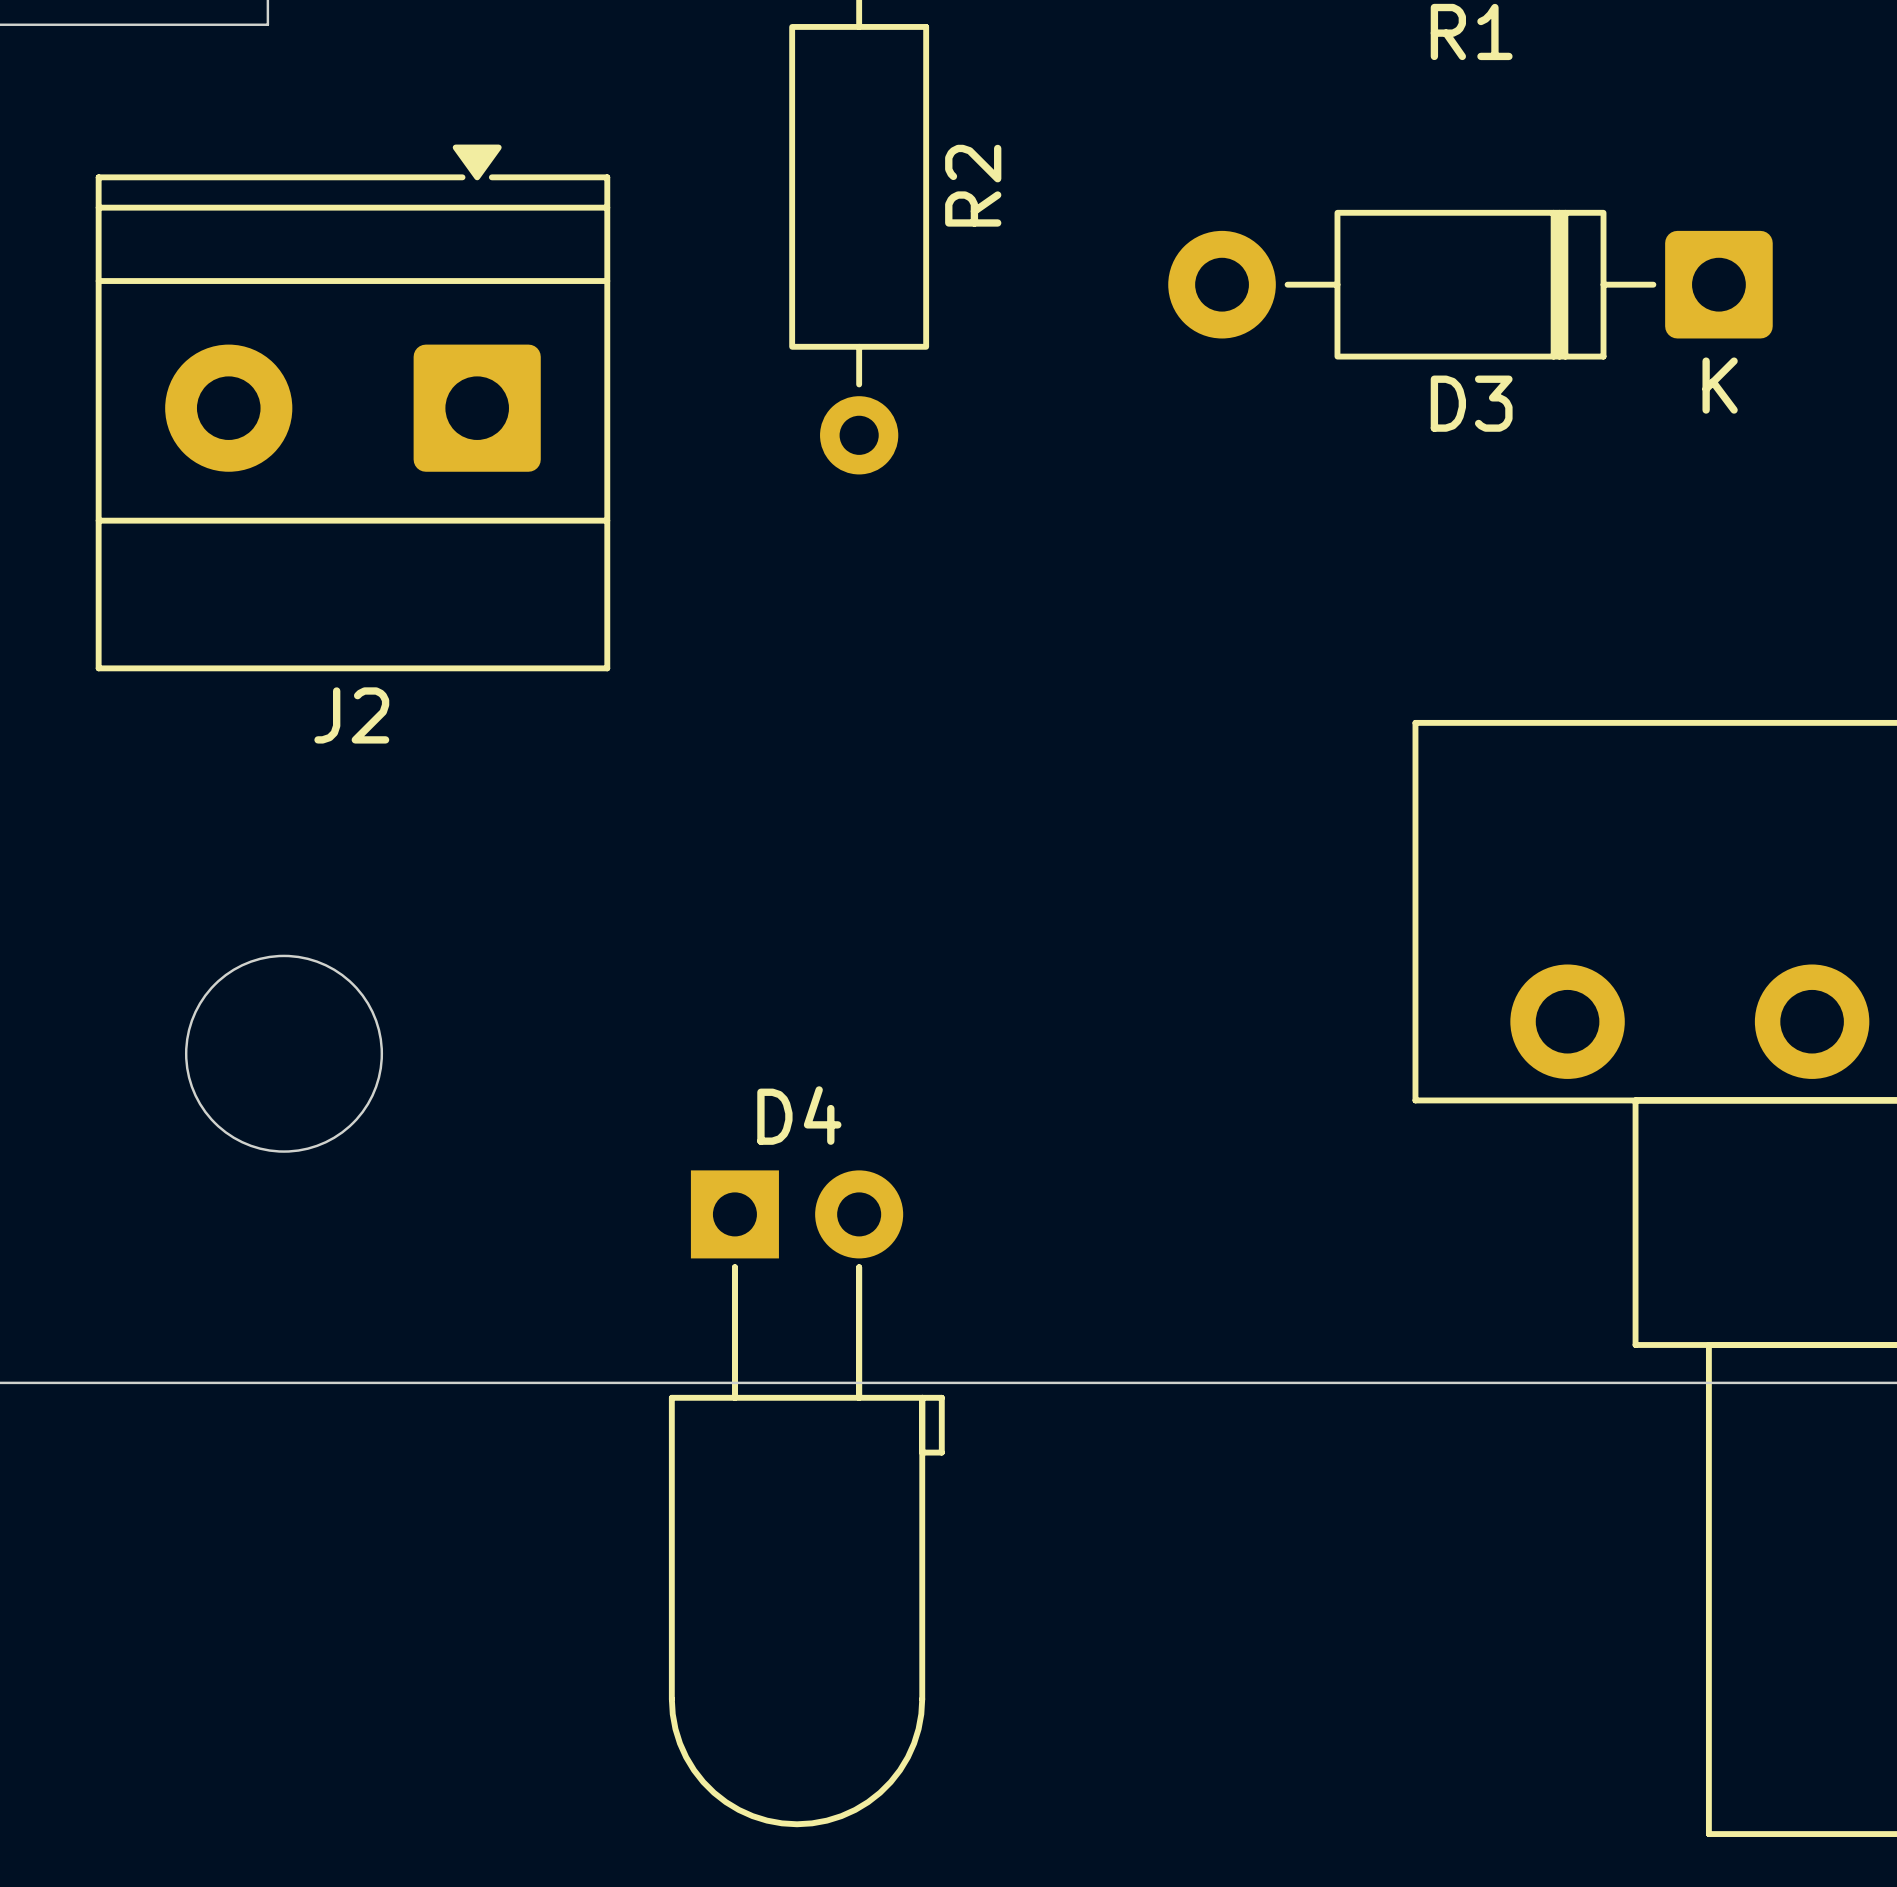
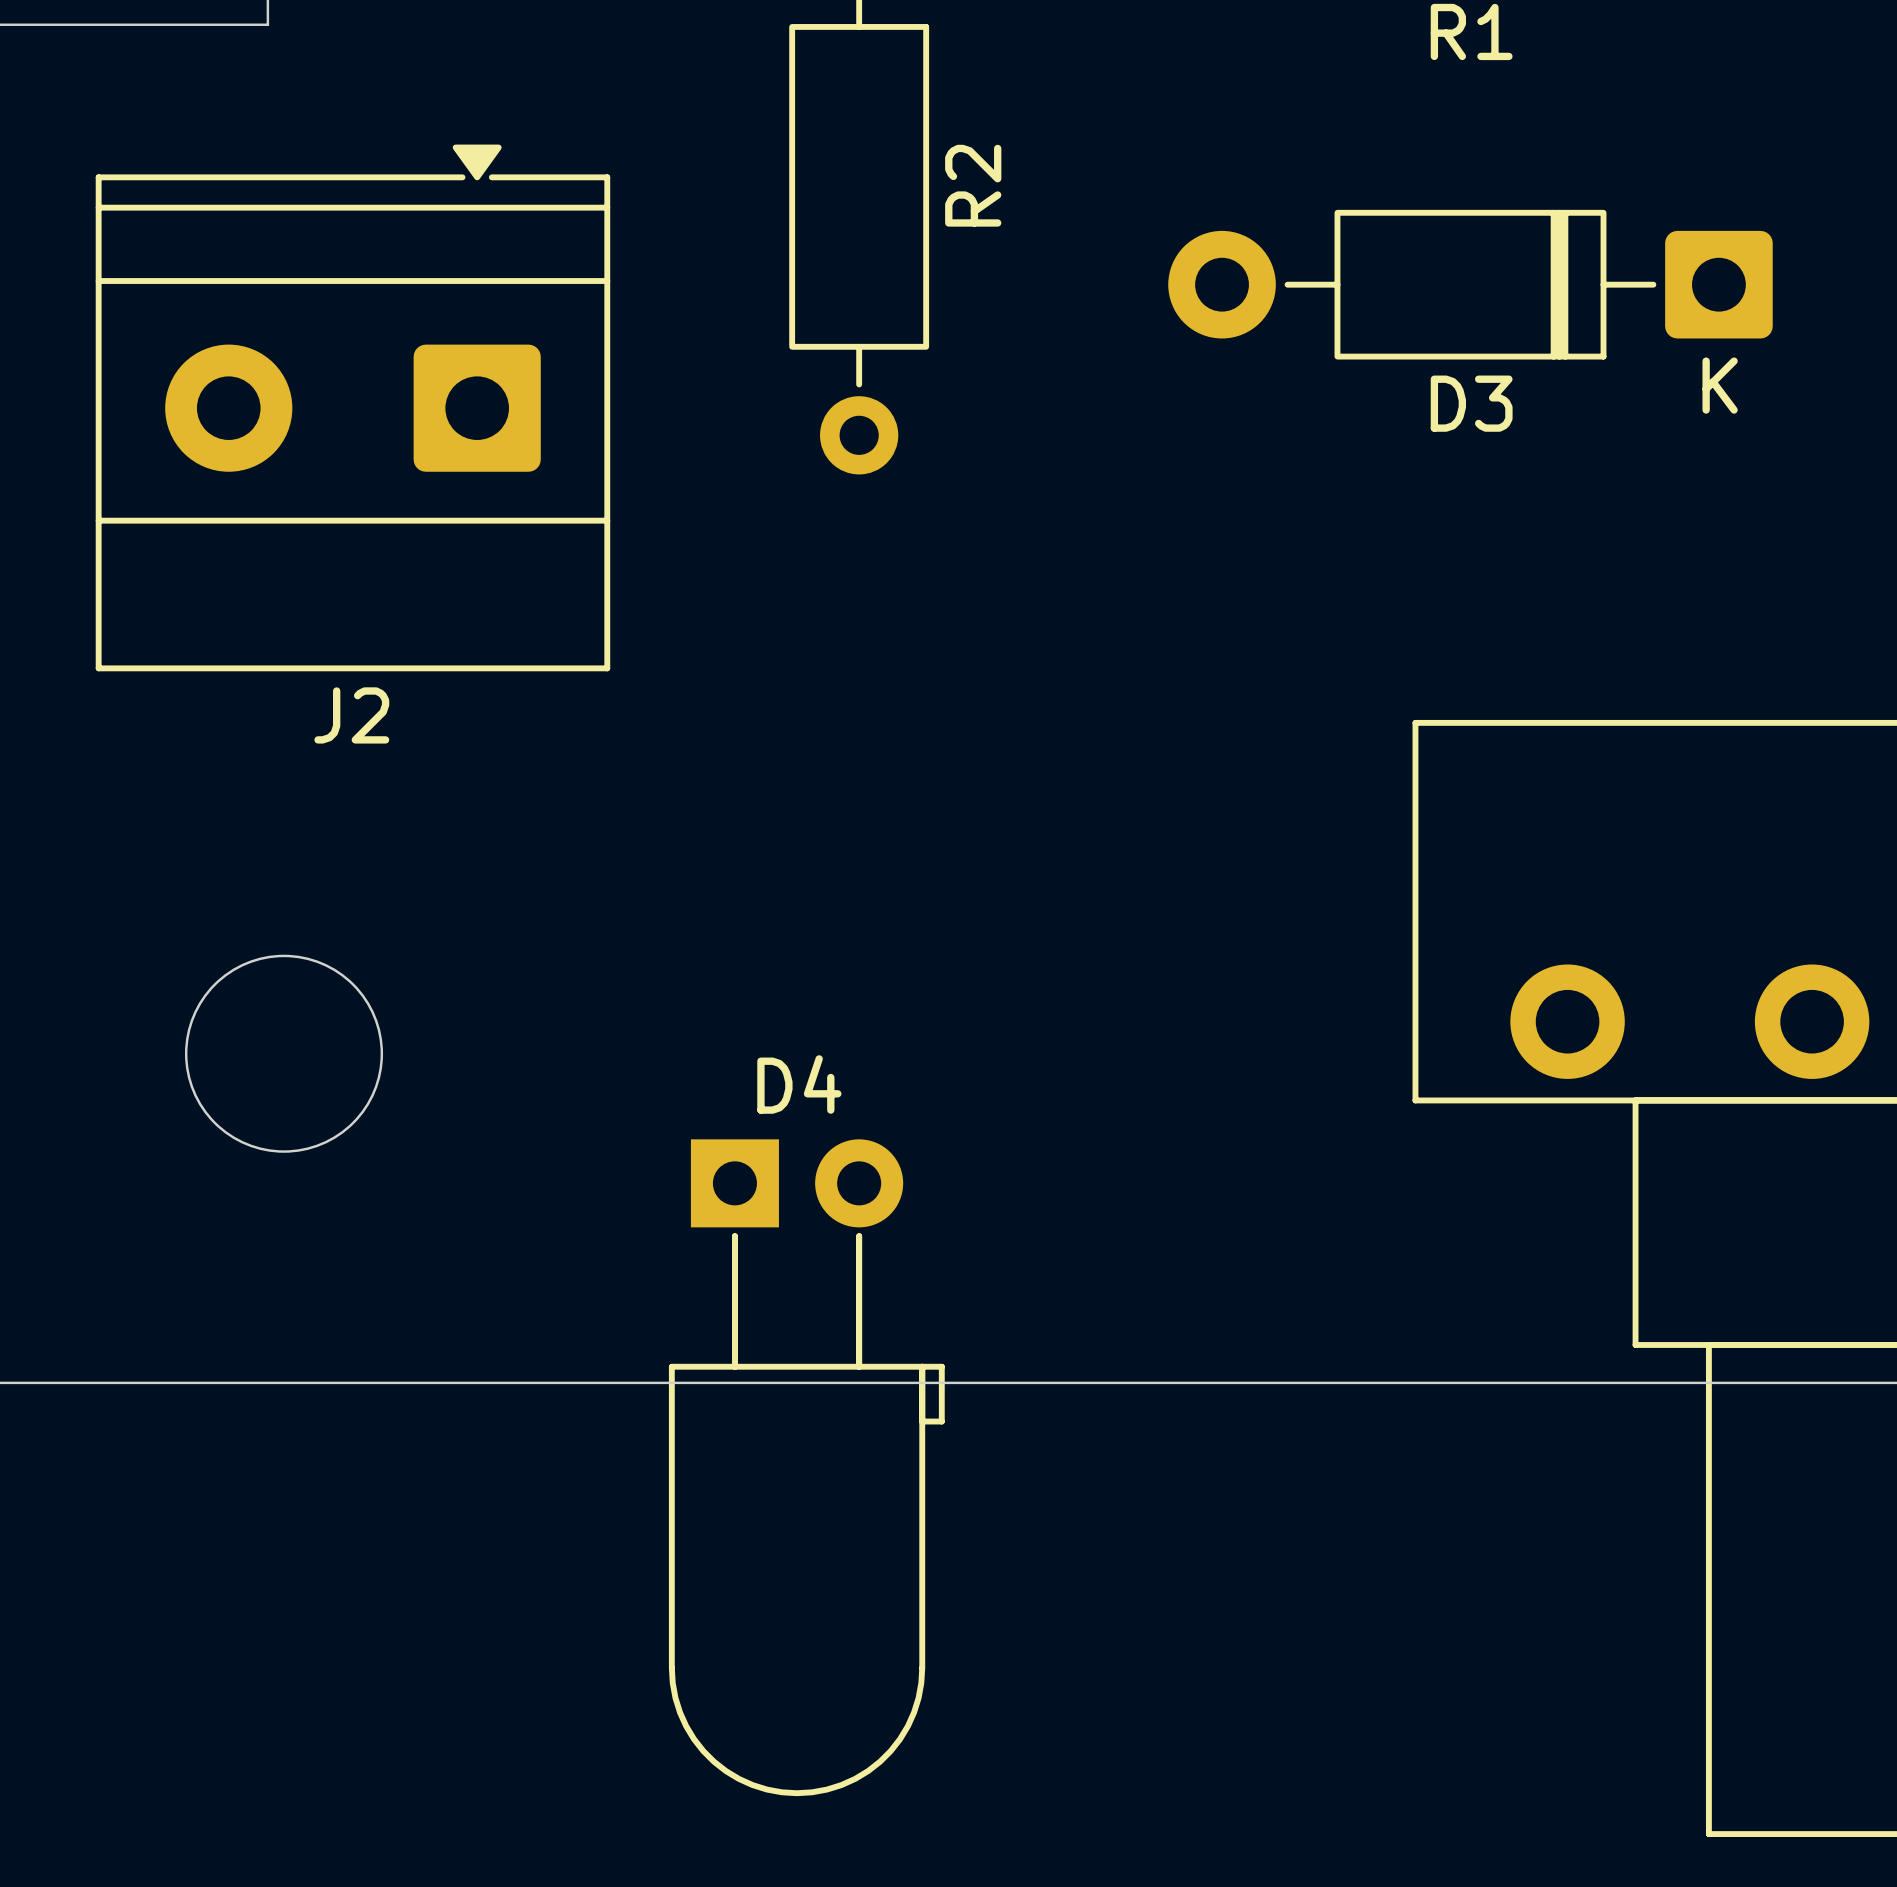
D4 position: (806, 1498) -> (806, 1467)

